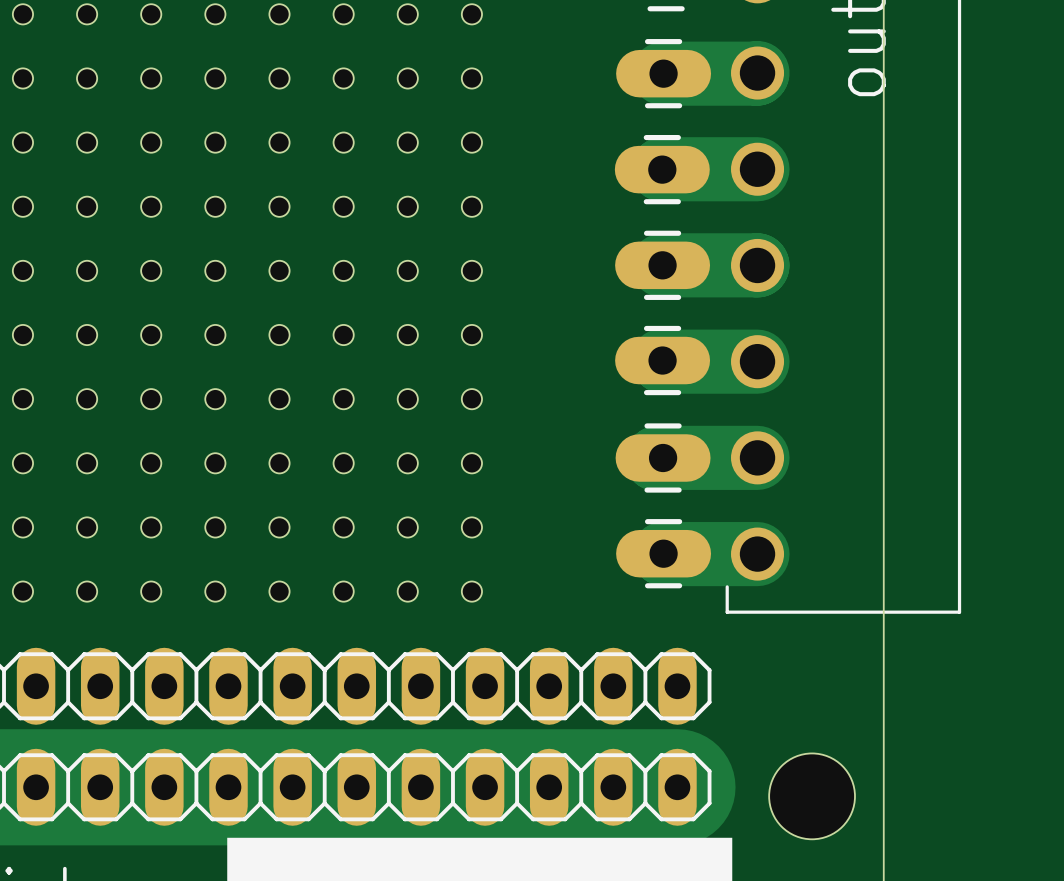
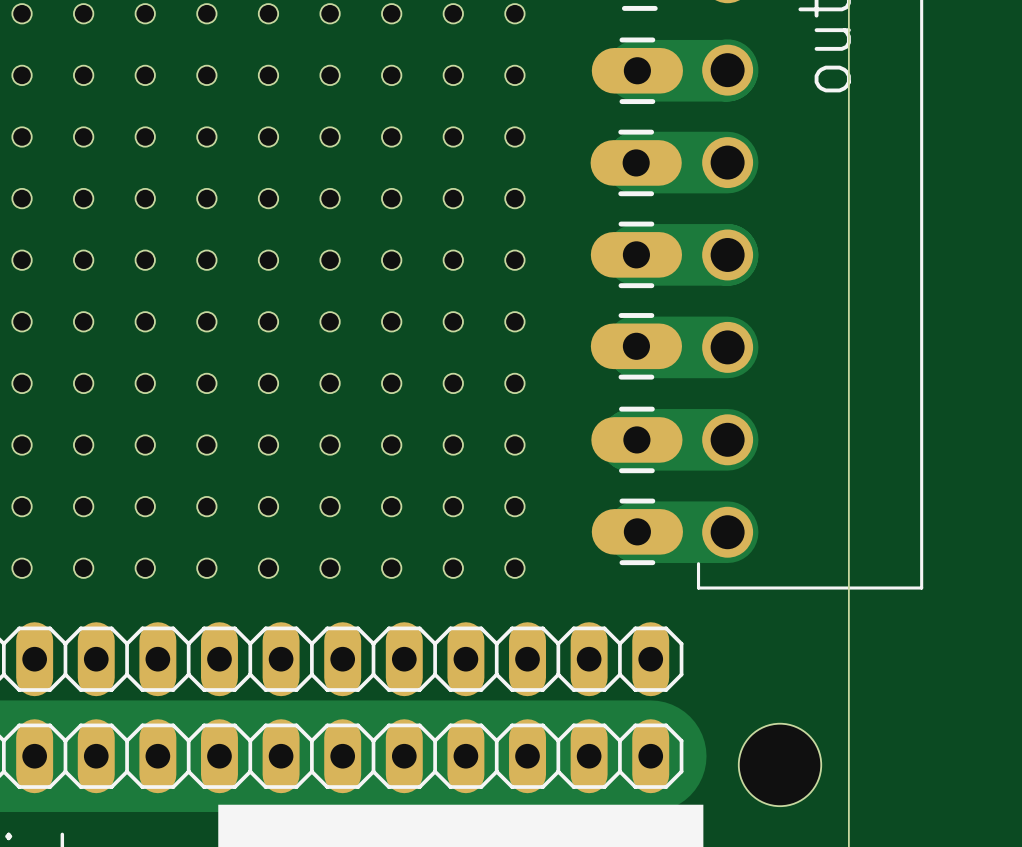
hole: none -> (514, 13)
hole: none -> (514, 75)
hole: none -> (514, 136)
hole: none -> (514, 198)
hole: none -> (514, 260)
hole: none -> (514, 321)
hole: none -> (514, 383)
hole: none -> (514, 445)
hole: none -> (514, 506)
hole: none -> (514, 568)

